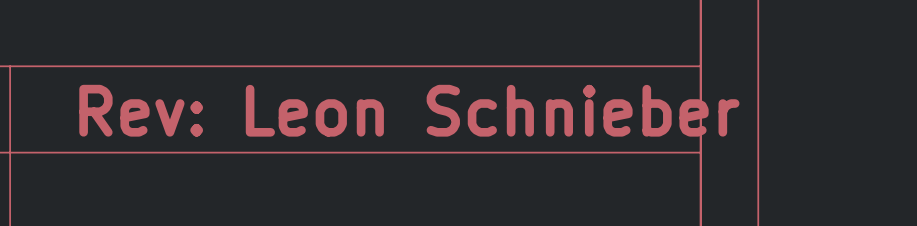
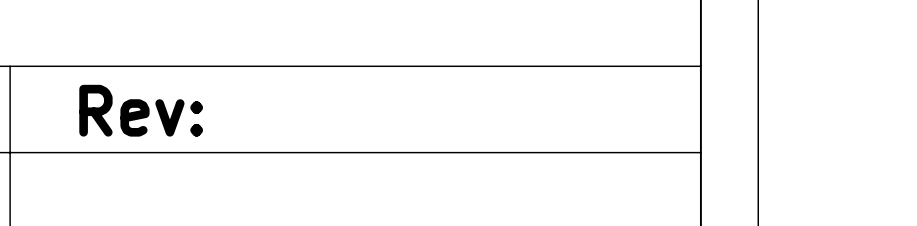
title block: Rev: Leon Schnieber (409, 110) -> Rev: (141, 110)

